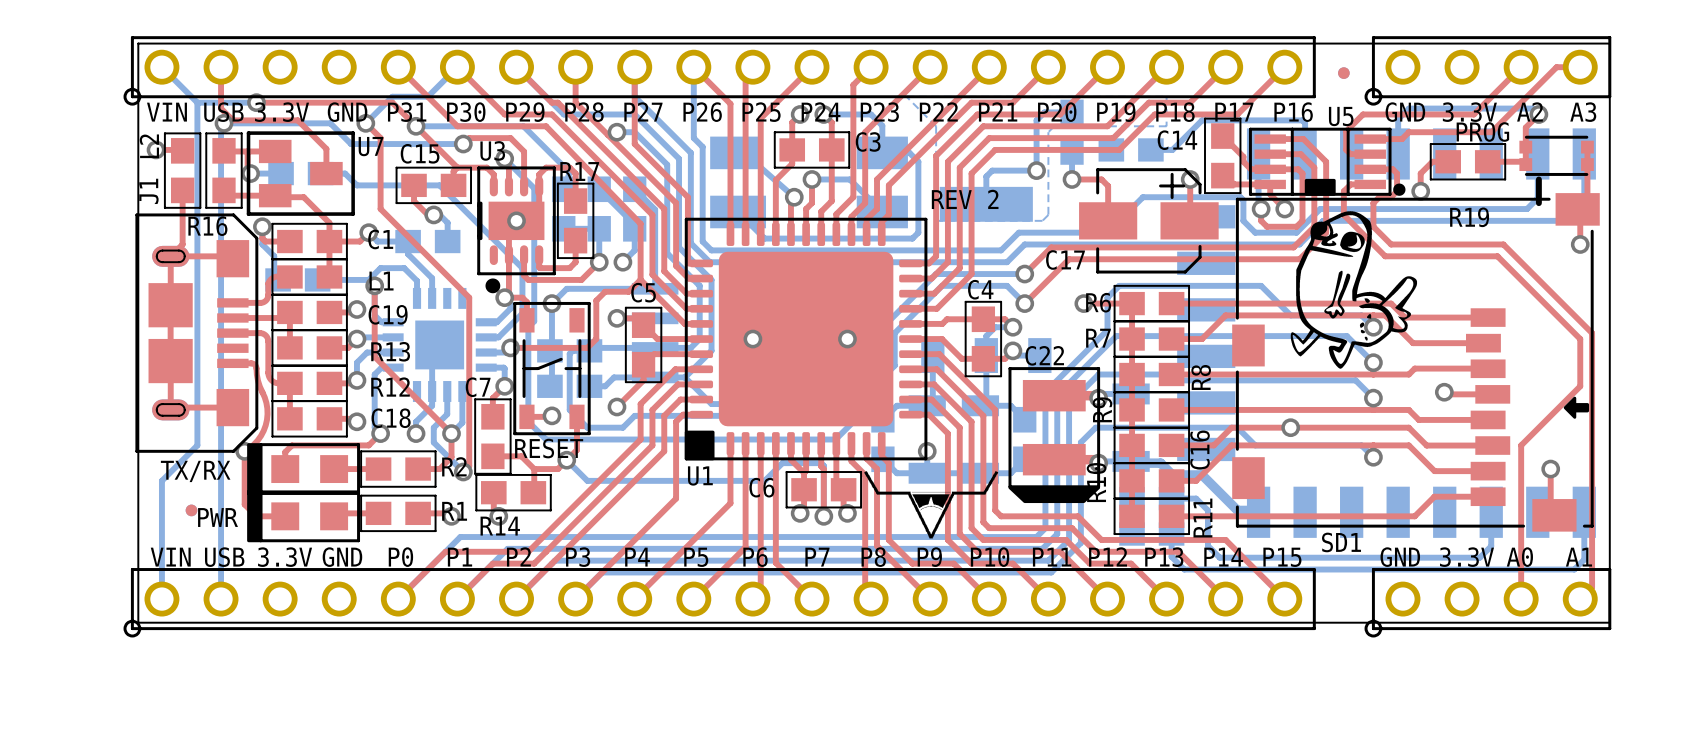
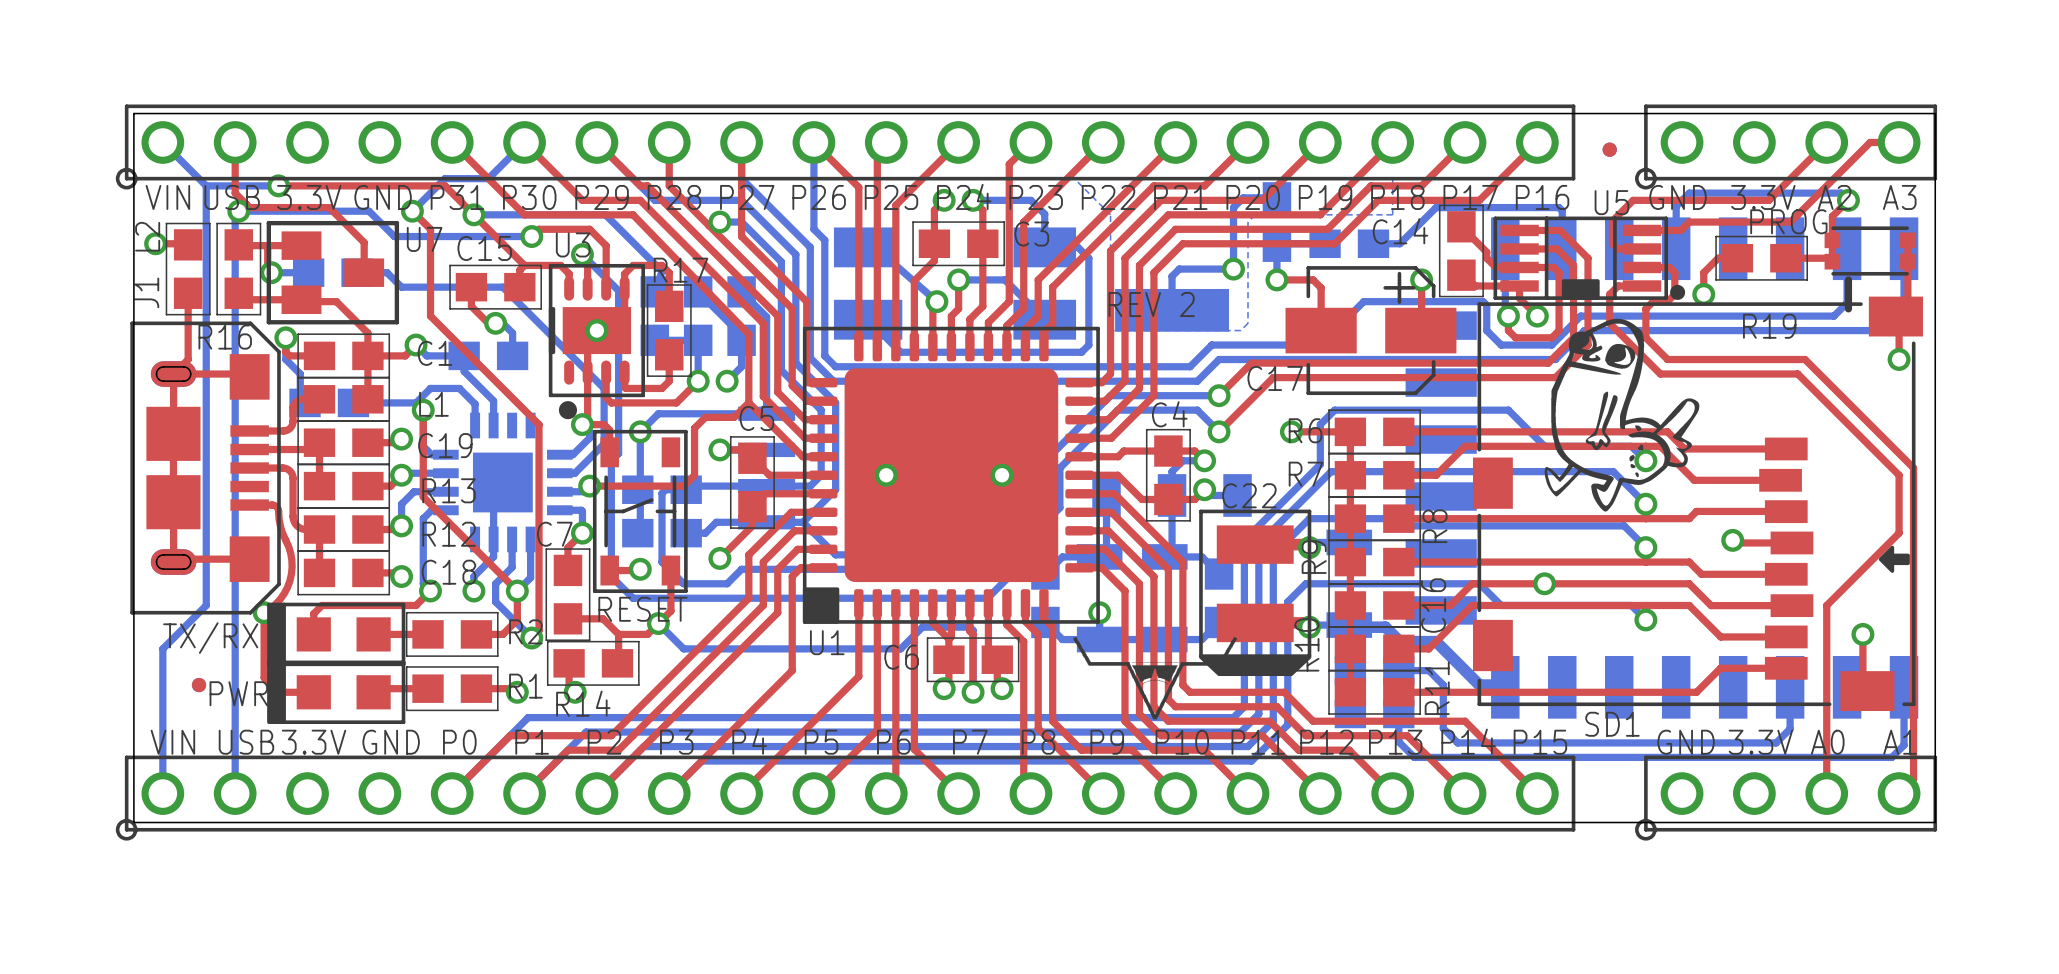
drawing position: (931, 504) -> (1155, 678)

